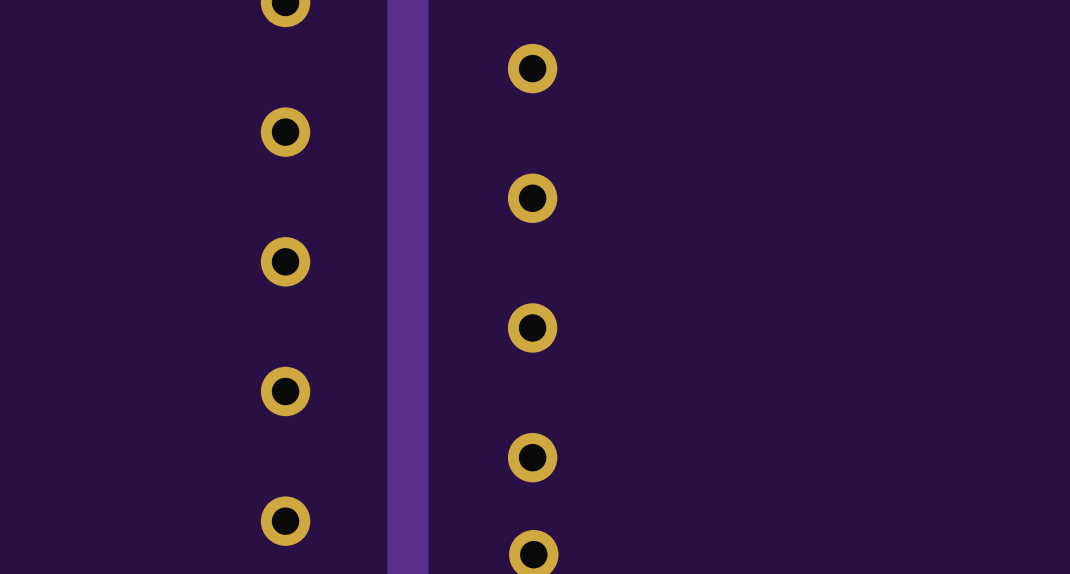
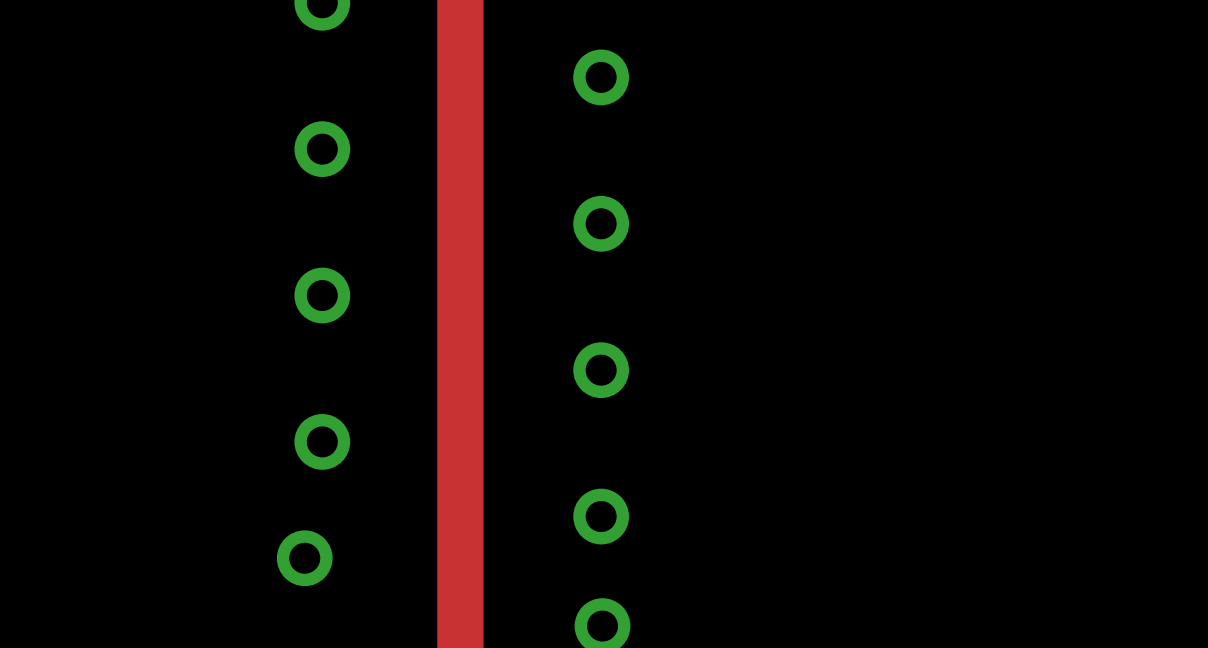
via position: (285, 521) -> (304, 558)

